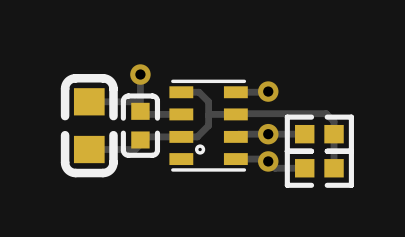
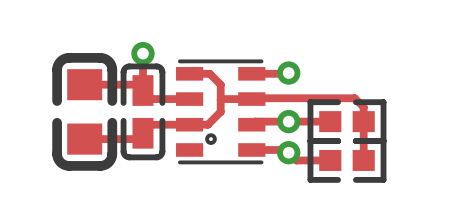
part footprint: [120, 93, 161, 158] -> [120, 63, 166, 161]

